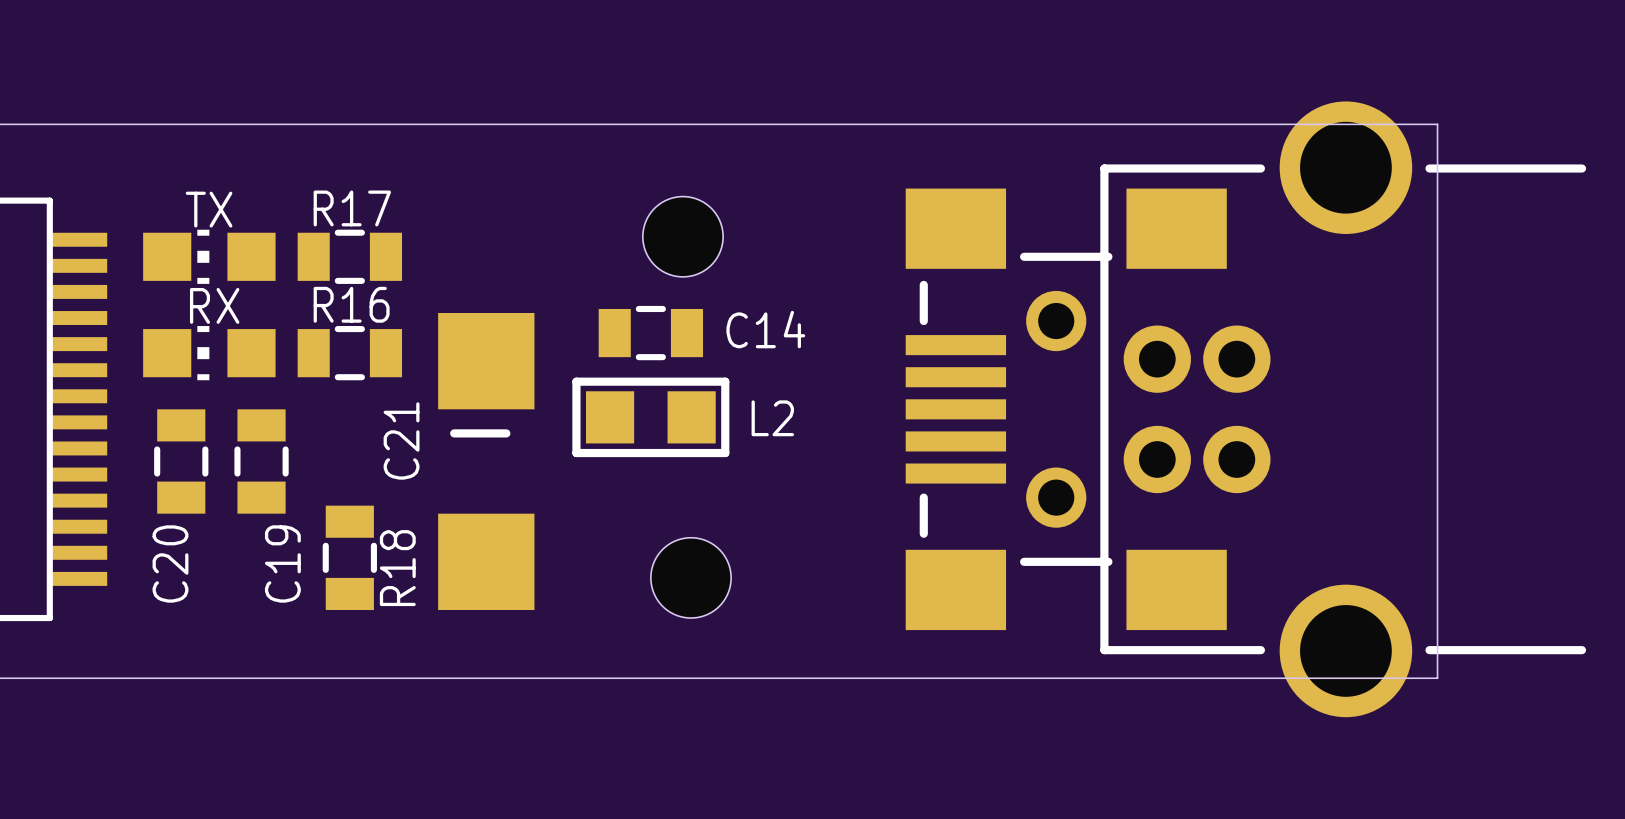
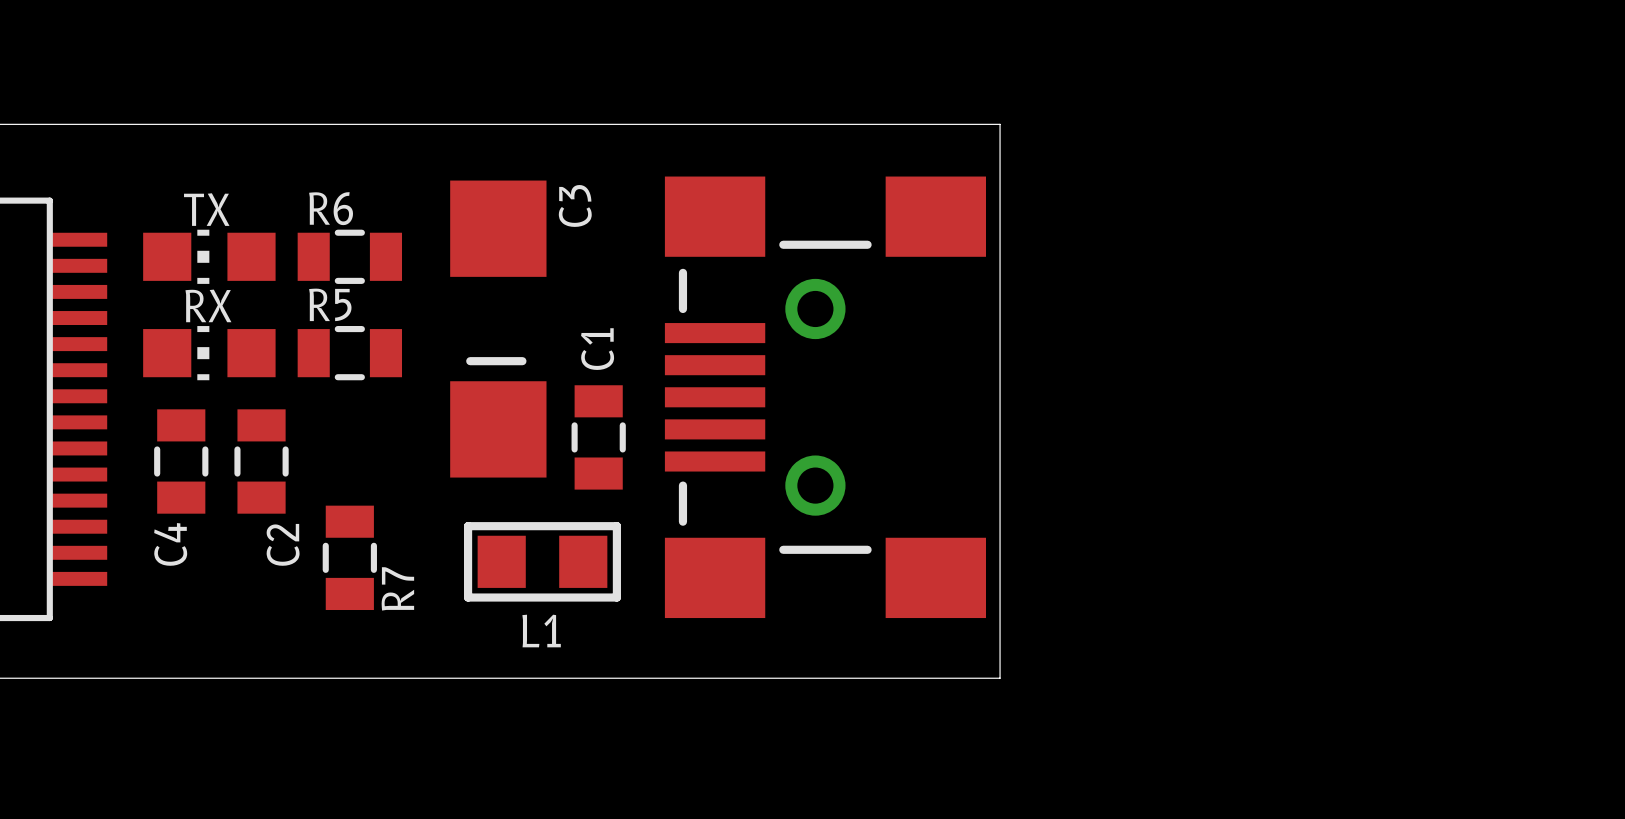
board edge: (1000, 124) (1437, 124) (1437, 678) (1000, 678) -> (1000, 124) (1000, 678)
R17 name: R17 (352, 208) -> R6 (331, 208)
hole: (682, 236) -> none
R16 name: R16 (351, 304) -> R5 (330, 304)
C3: none -> (498, 329)
C14: (650, 333) -> none
part position: (1066, 409) -> (825, 397)
part: (1343, 409) -> none
L2: (650, 417) -> none
line: (454, 433) (506, 433) -> (470, 361) (522, 361)
C1: none -> (598, 437)
C21: (486, 461) -> none
L1: none -> (542, 561)
C20 name: C20 (170, 564) -> C4 (170, 544)
C19 name: C19 (282, 564) -> C2 (283, 544)
R18 name: R18 (397, 568) -> R7 (397, 588)
hole: (690, 577) -> none

